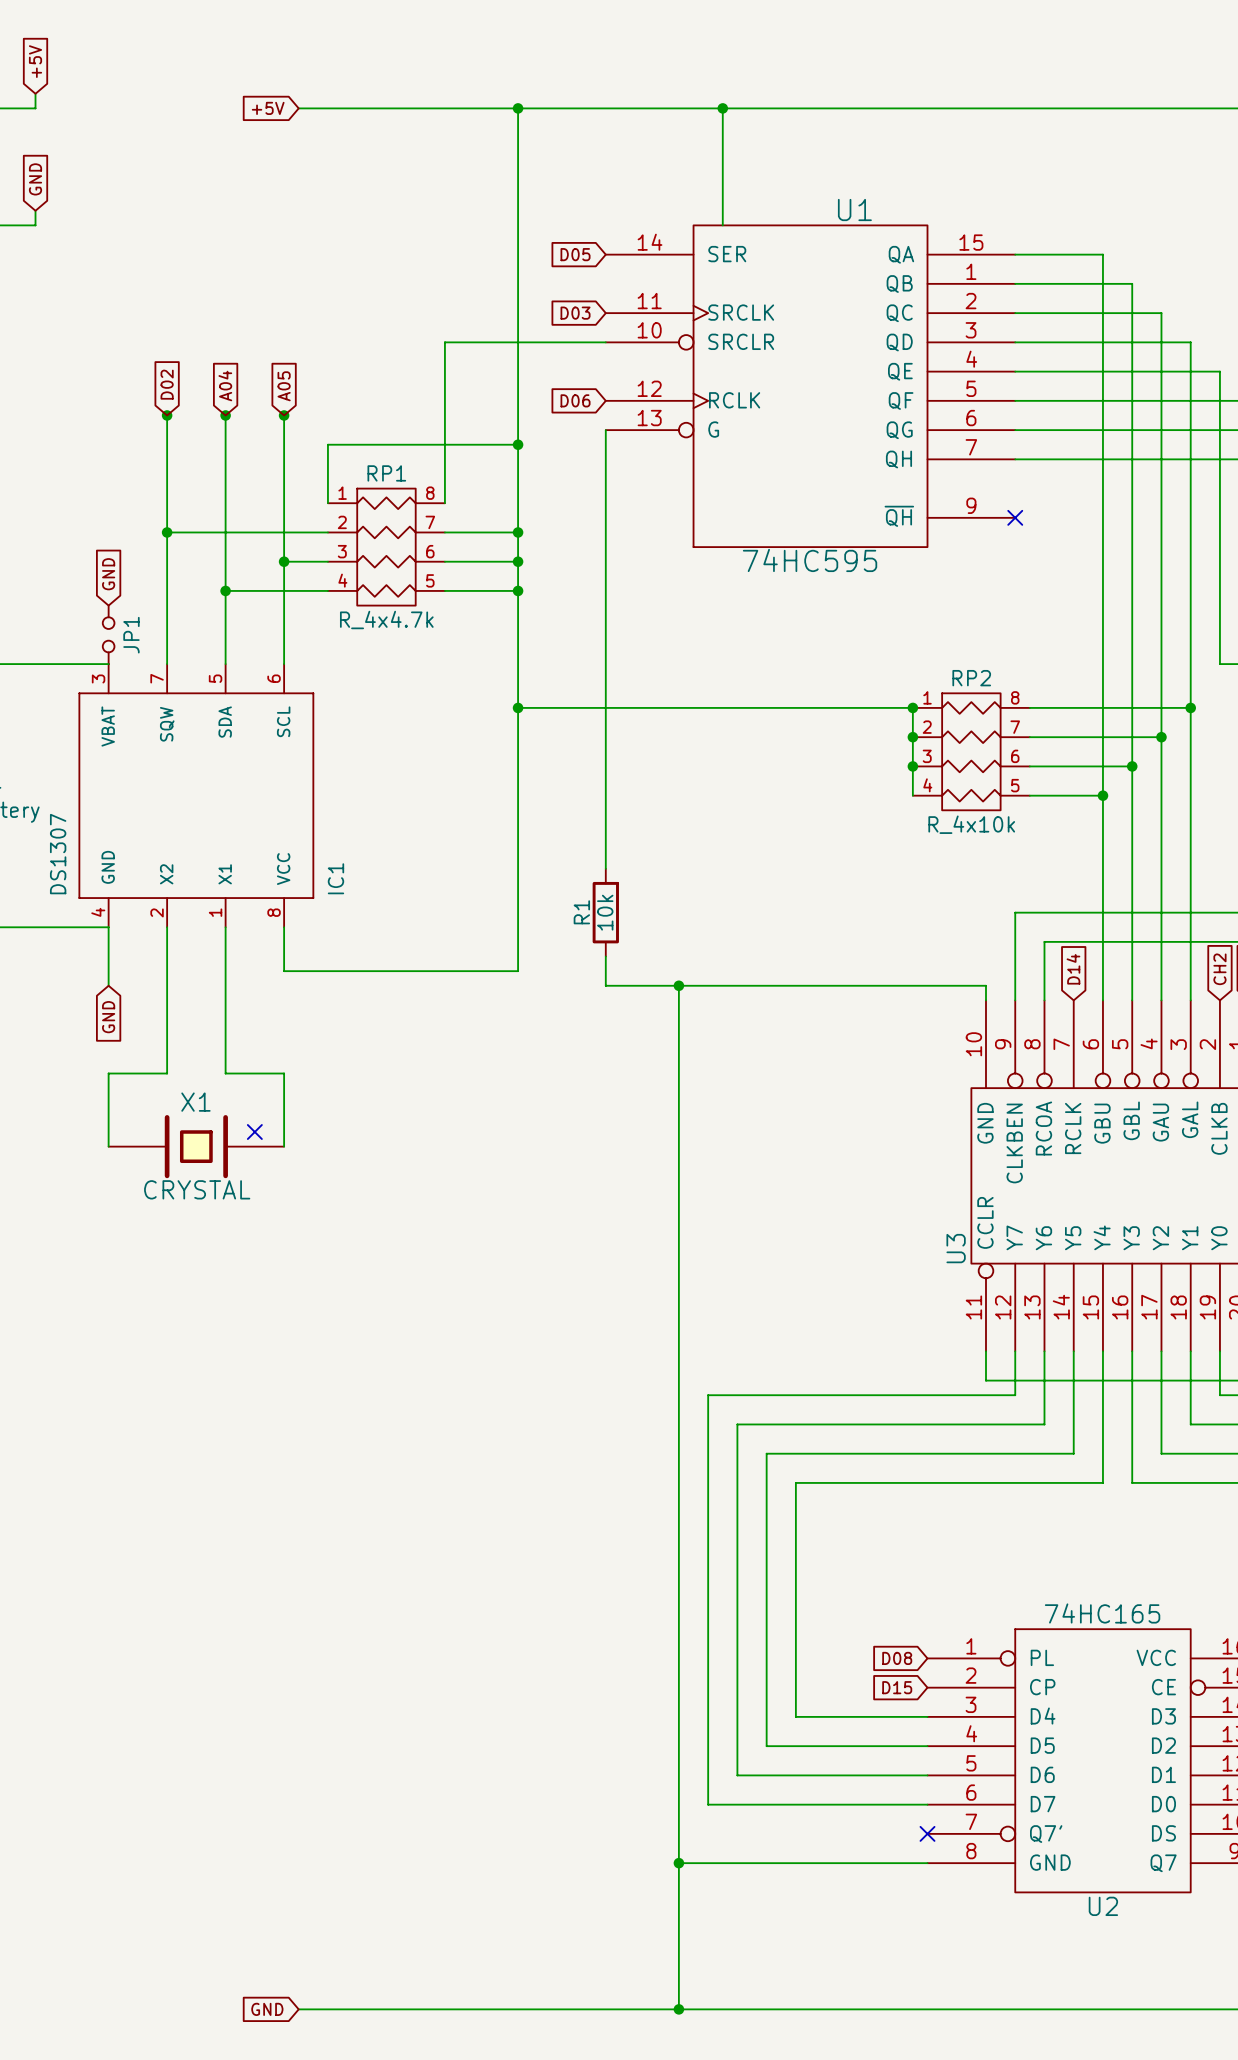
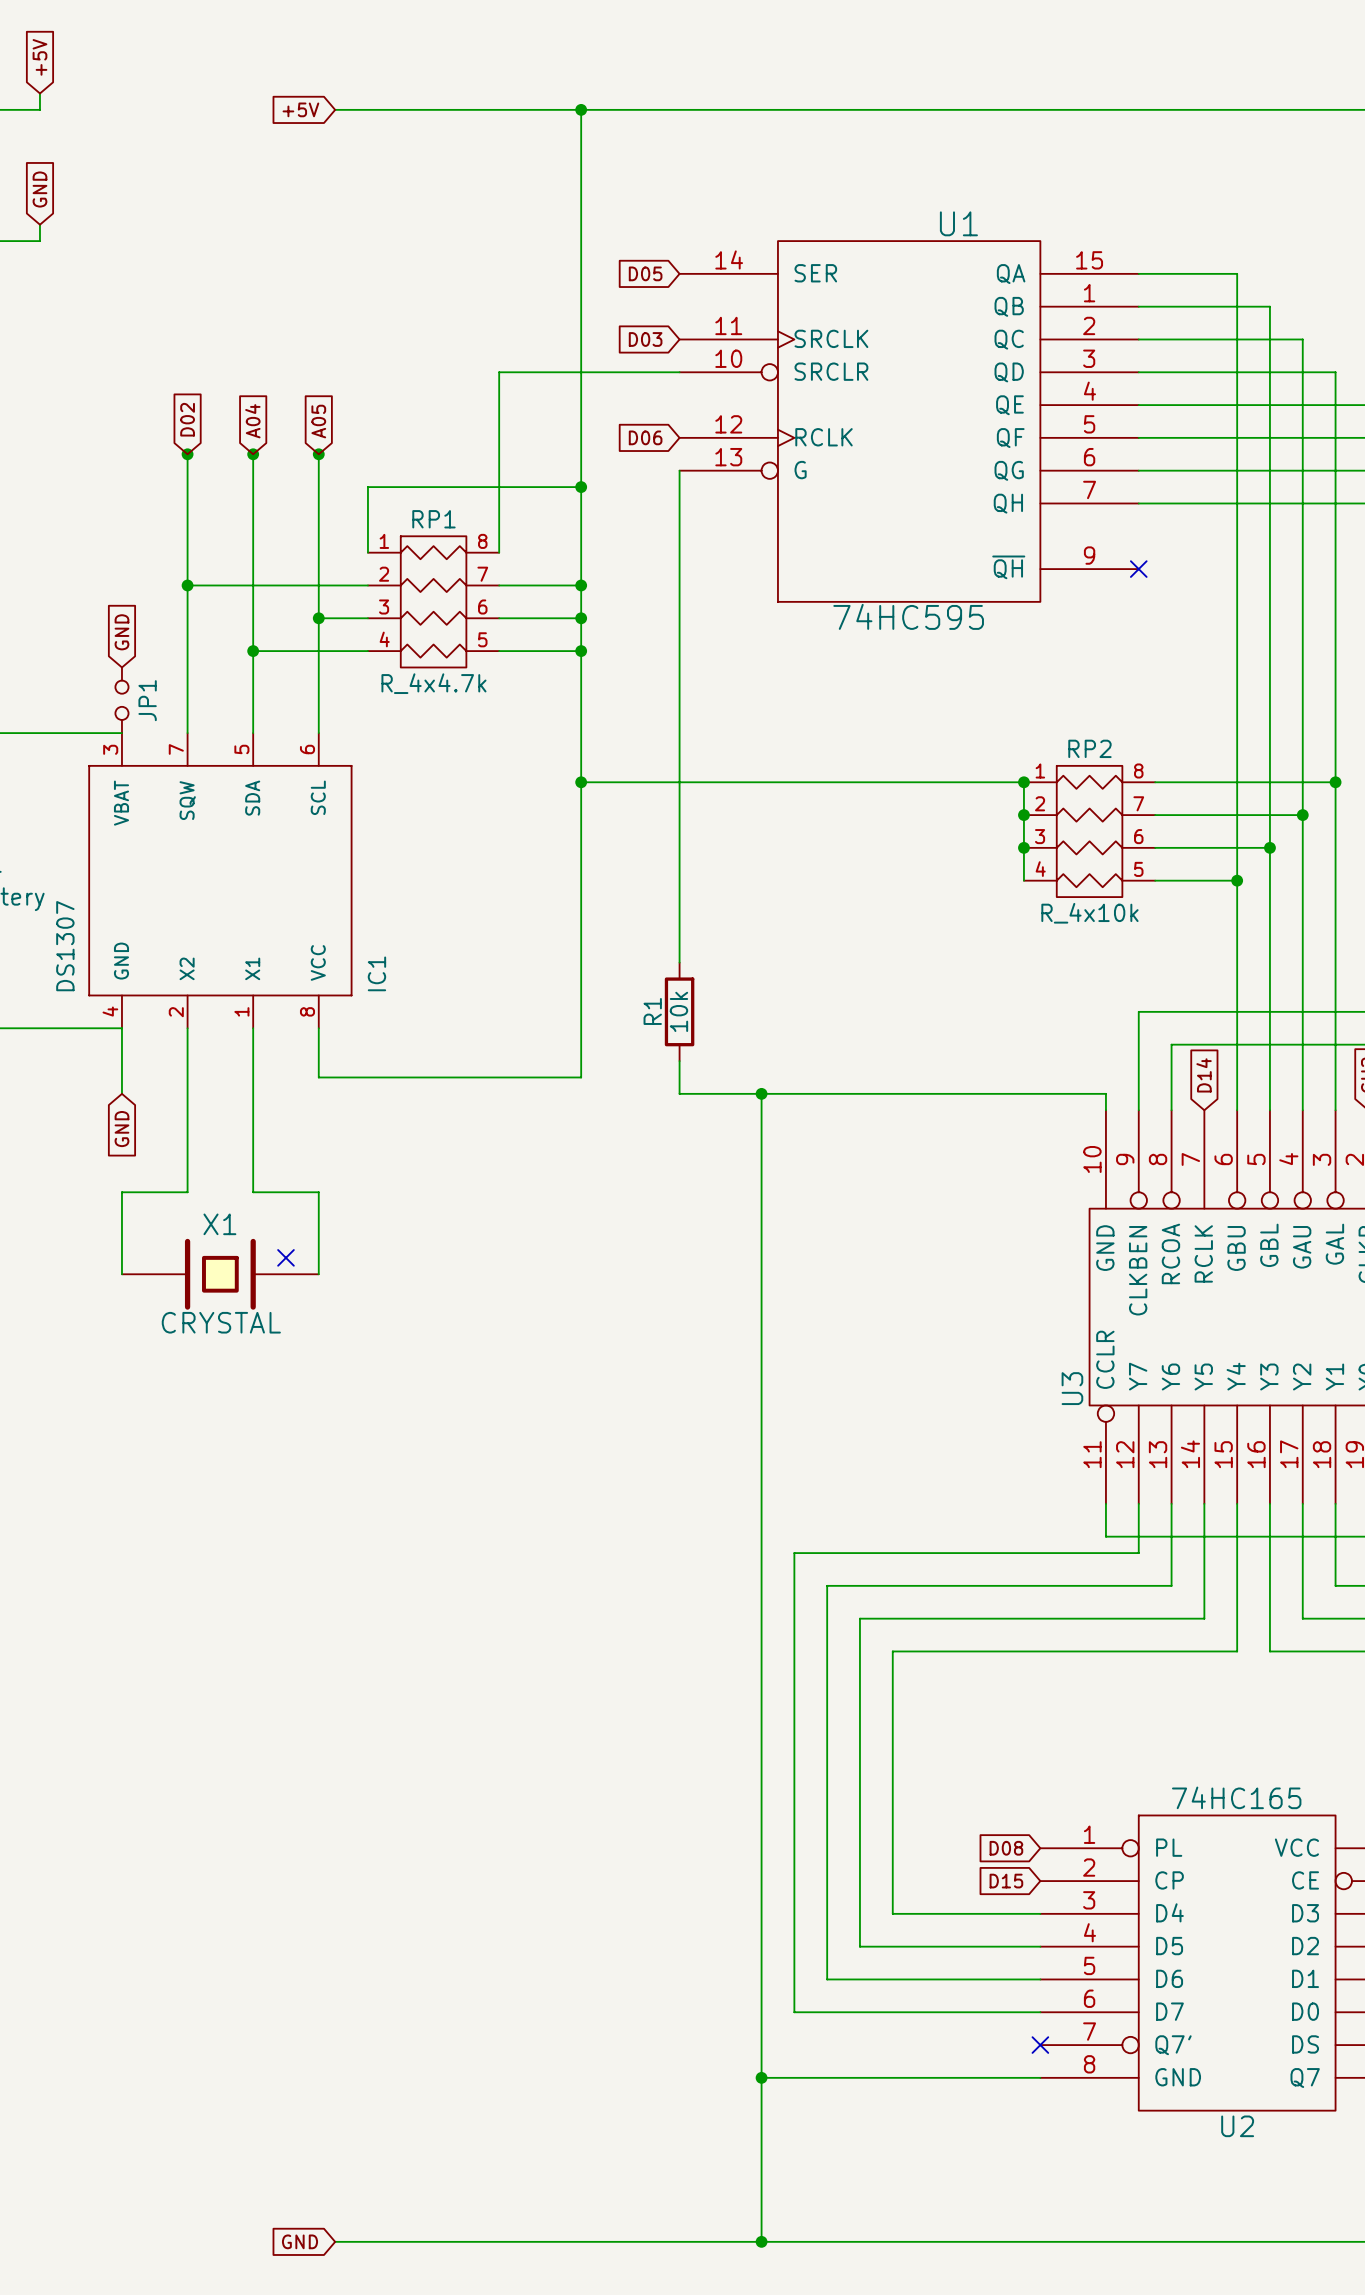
wire: (722, 108) (722, 225) -> none
junction: (722, 108) -> none

